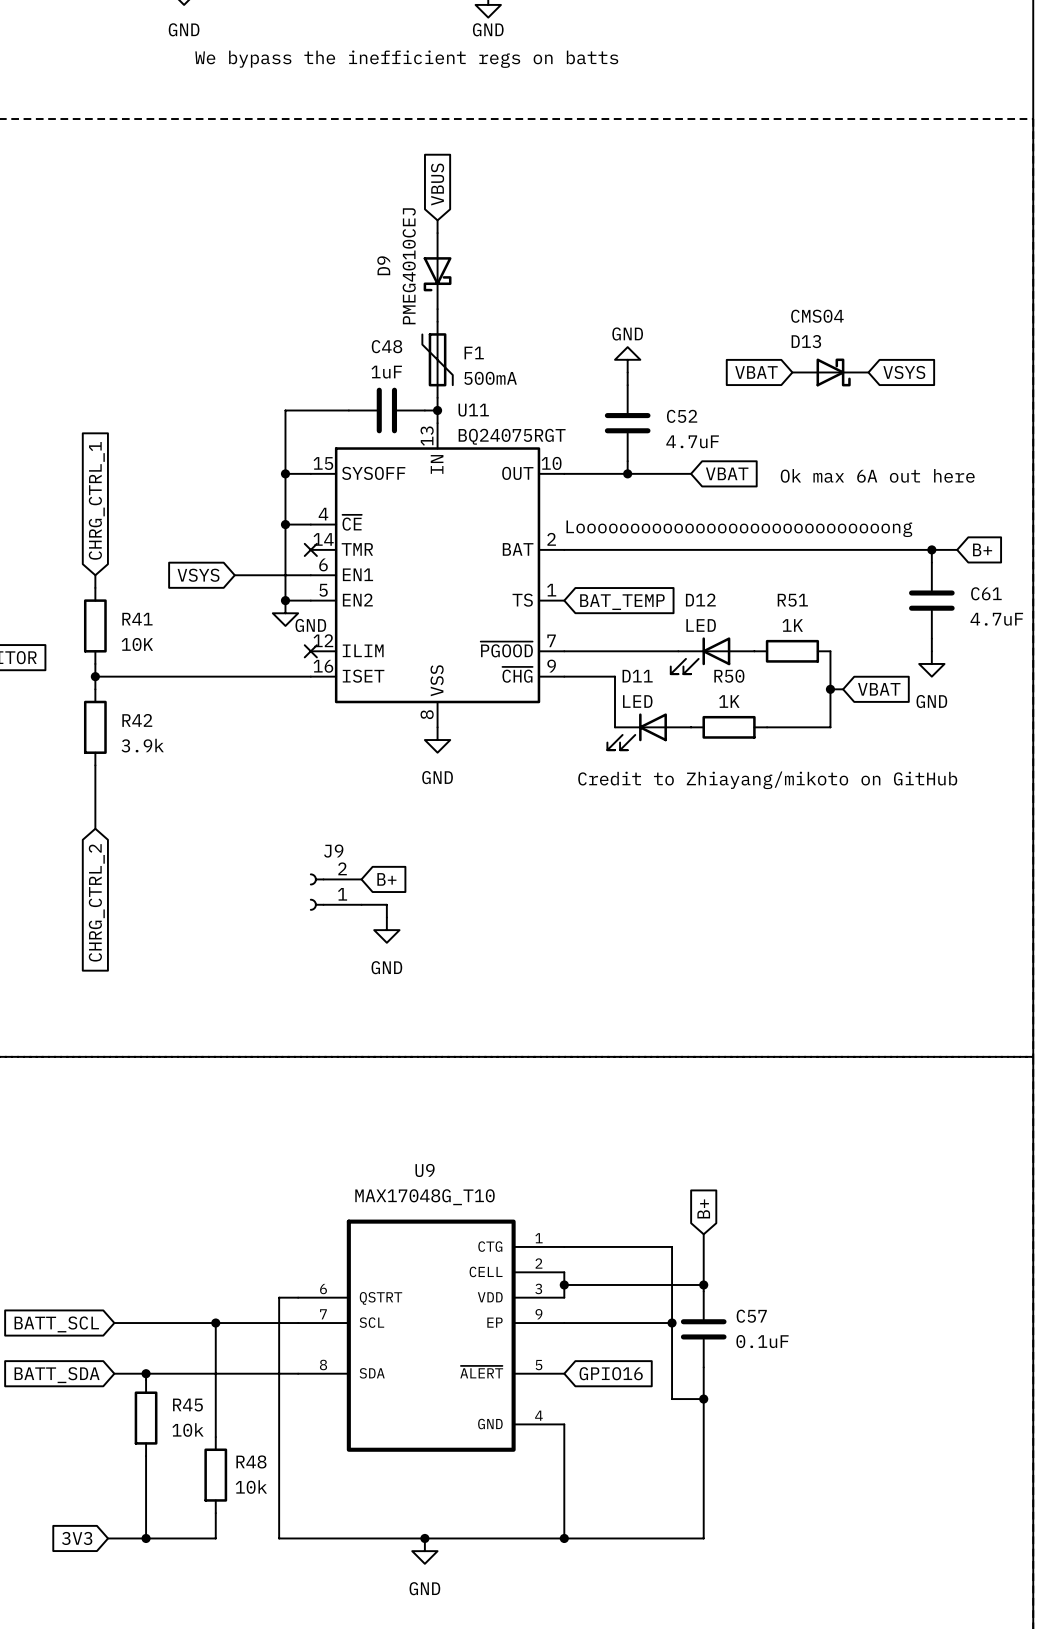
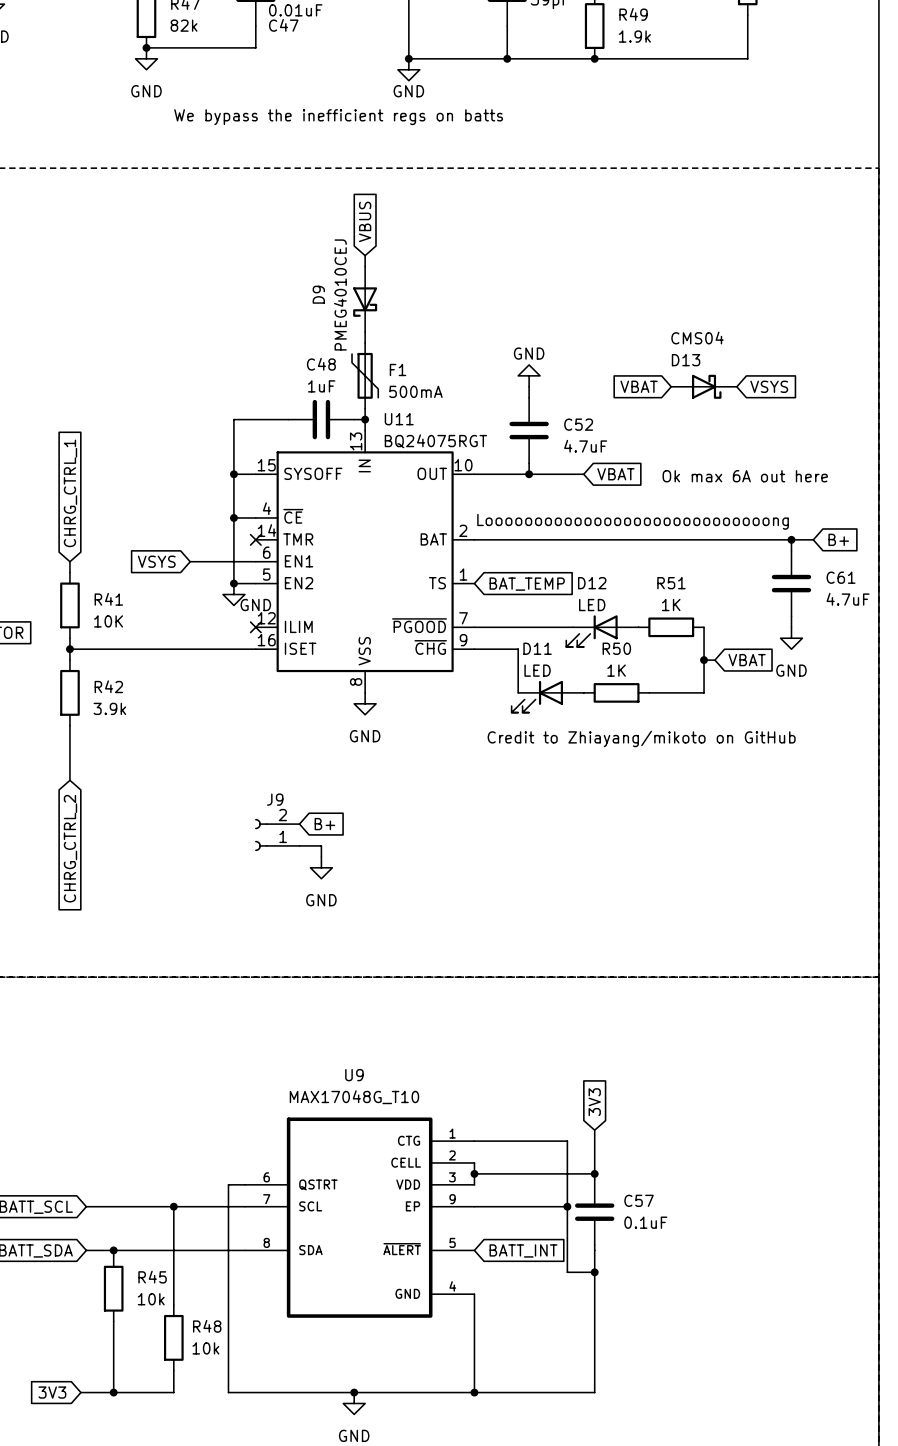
global label: B+ (703, 1208) -> 3V3 (594, 1102)
global label: GPIO16 (611, 1373) -> BATT_INT (523, 1250)

